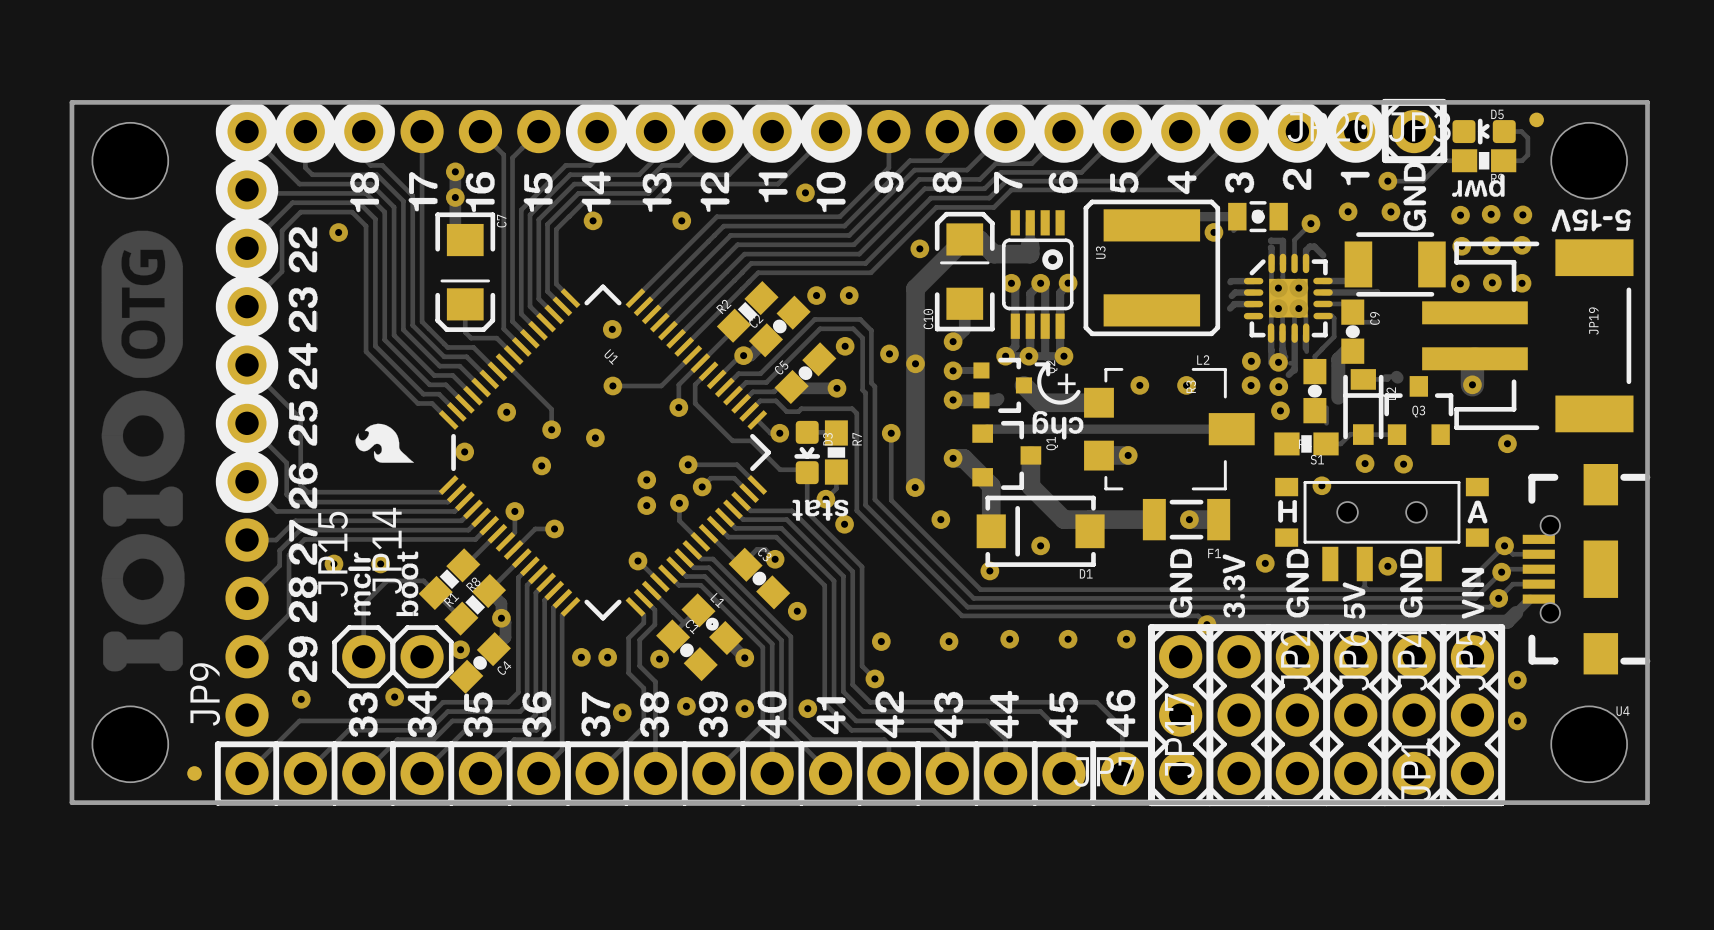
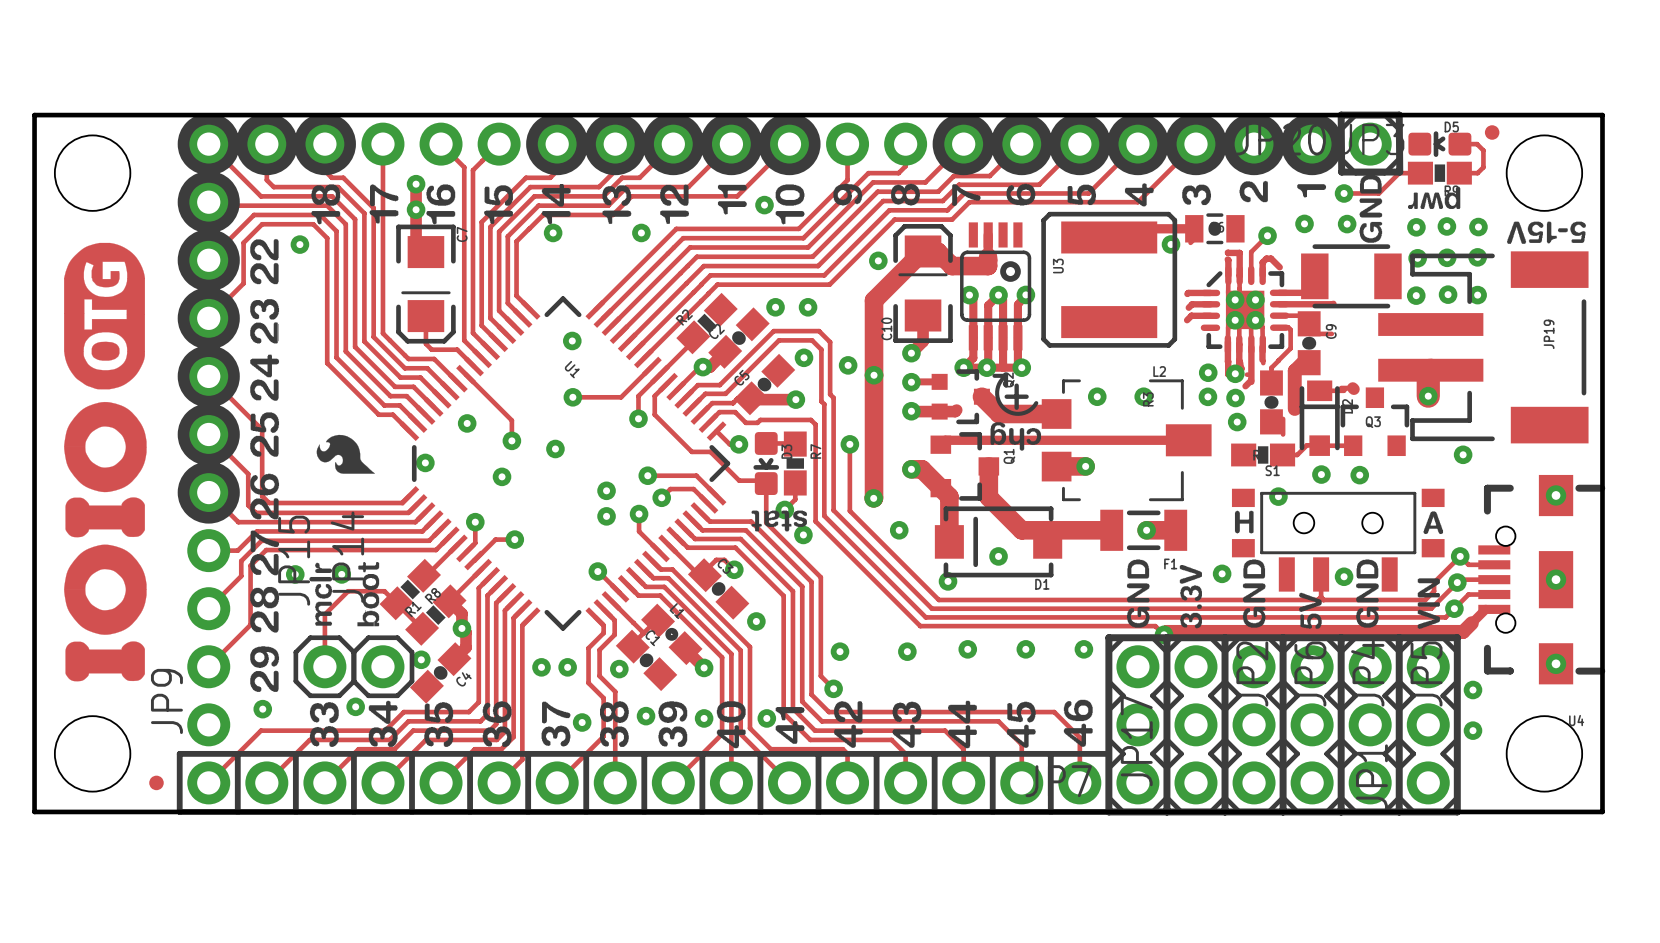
via: none -> (1556, 495)
via: none -> (1556, 579)
via: none -> (1556, 663)

